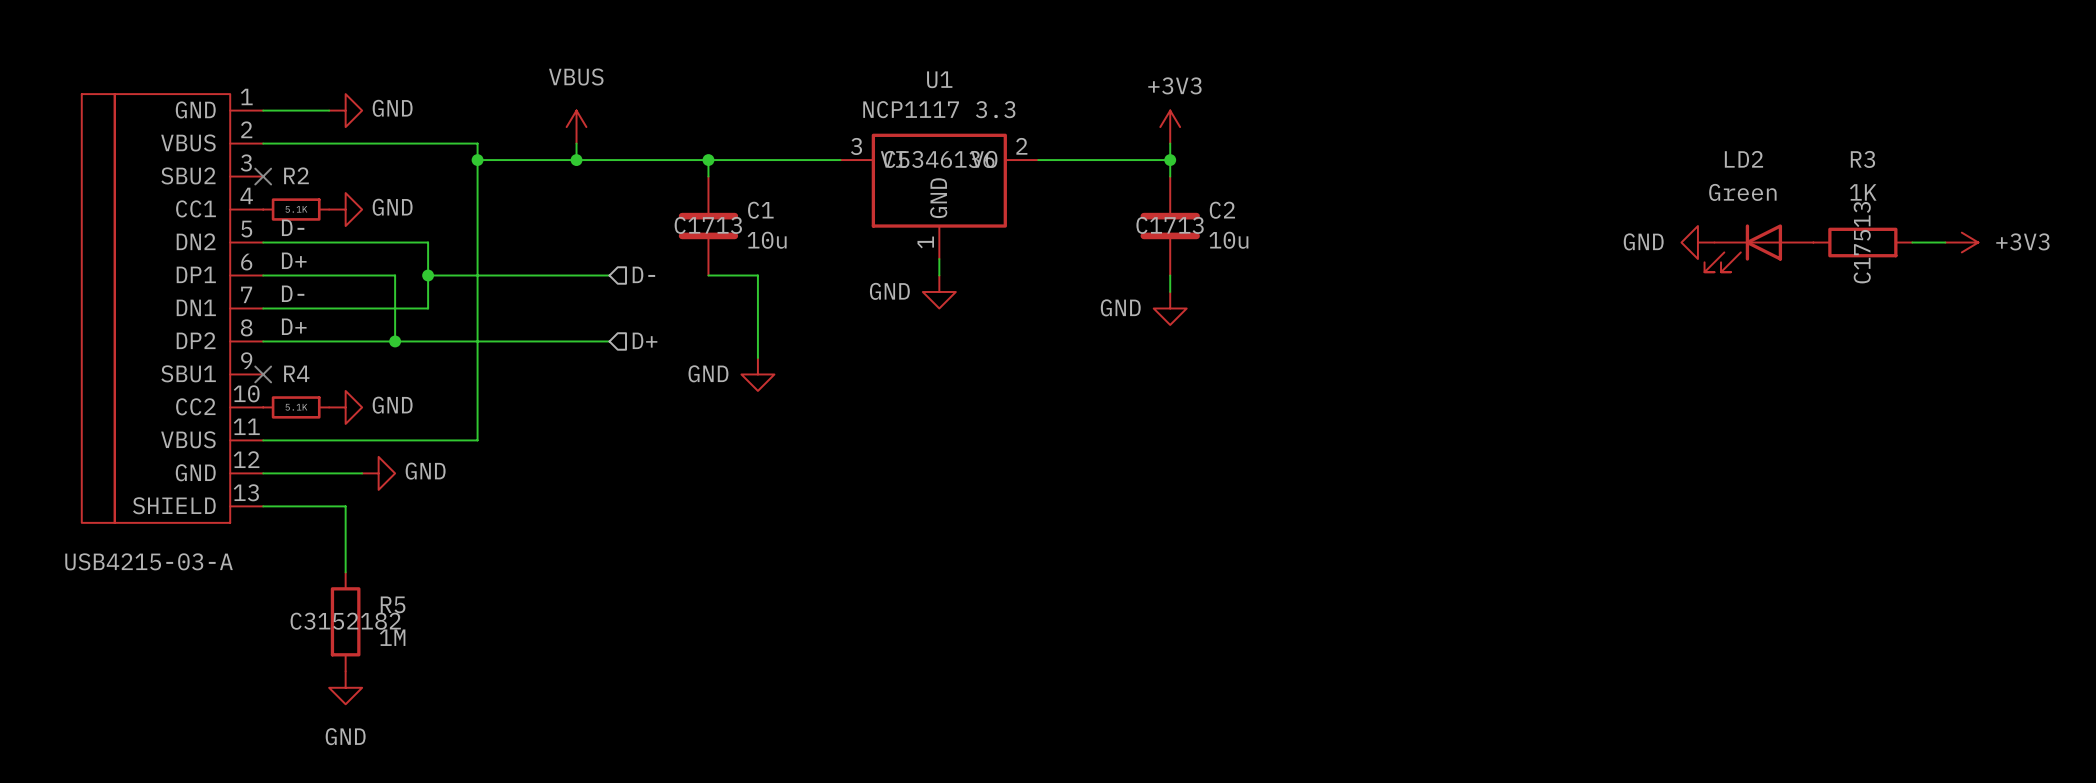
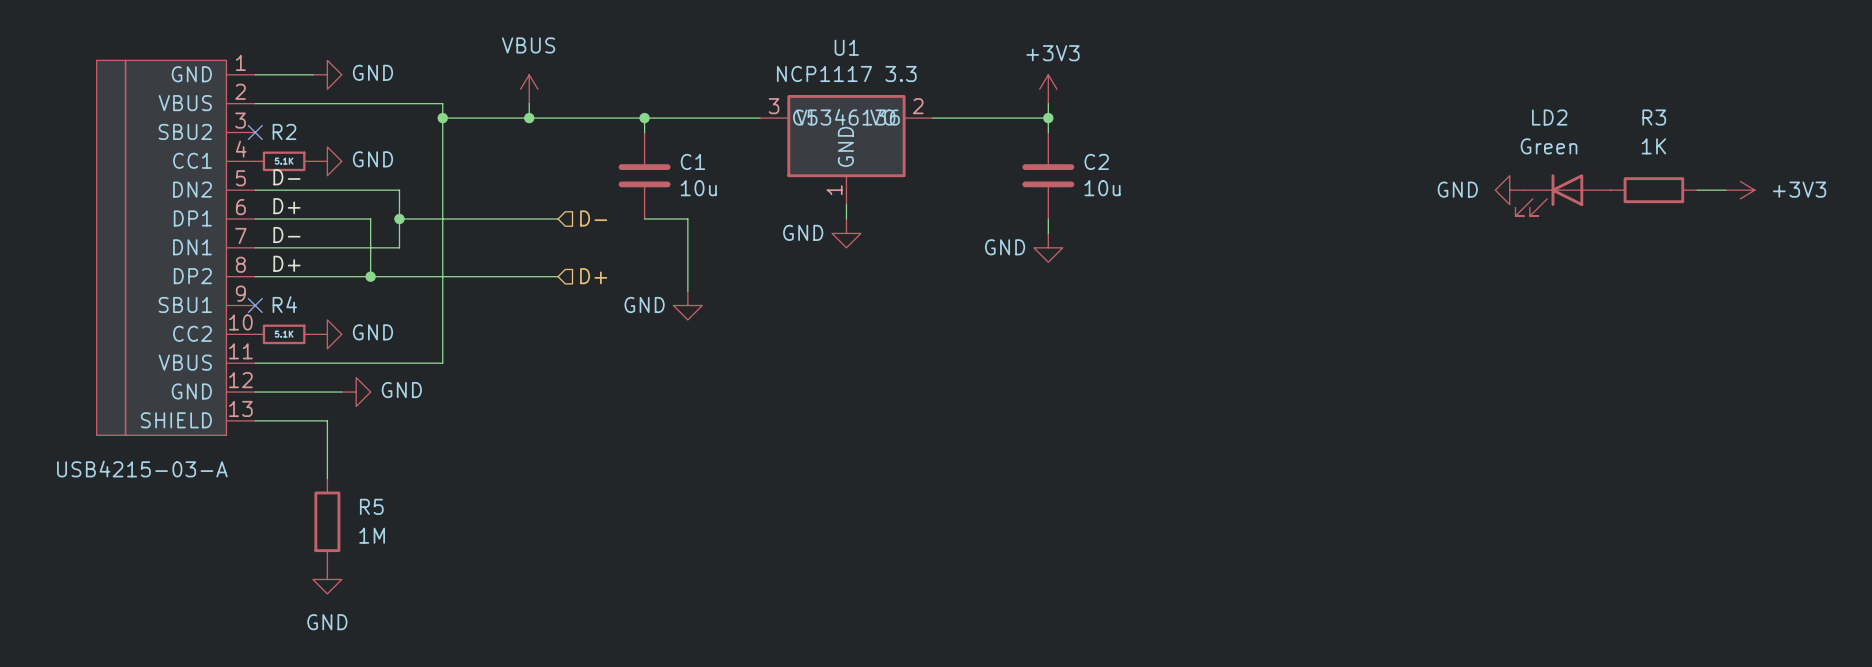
C1 text: C1713 (708, 225) -> none
C2 text: C1713 (1170, 225) -> none
R3 text: C17513 (1862, 242) -> none
R5 text: C3152182 (345, 621) -> none

